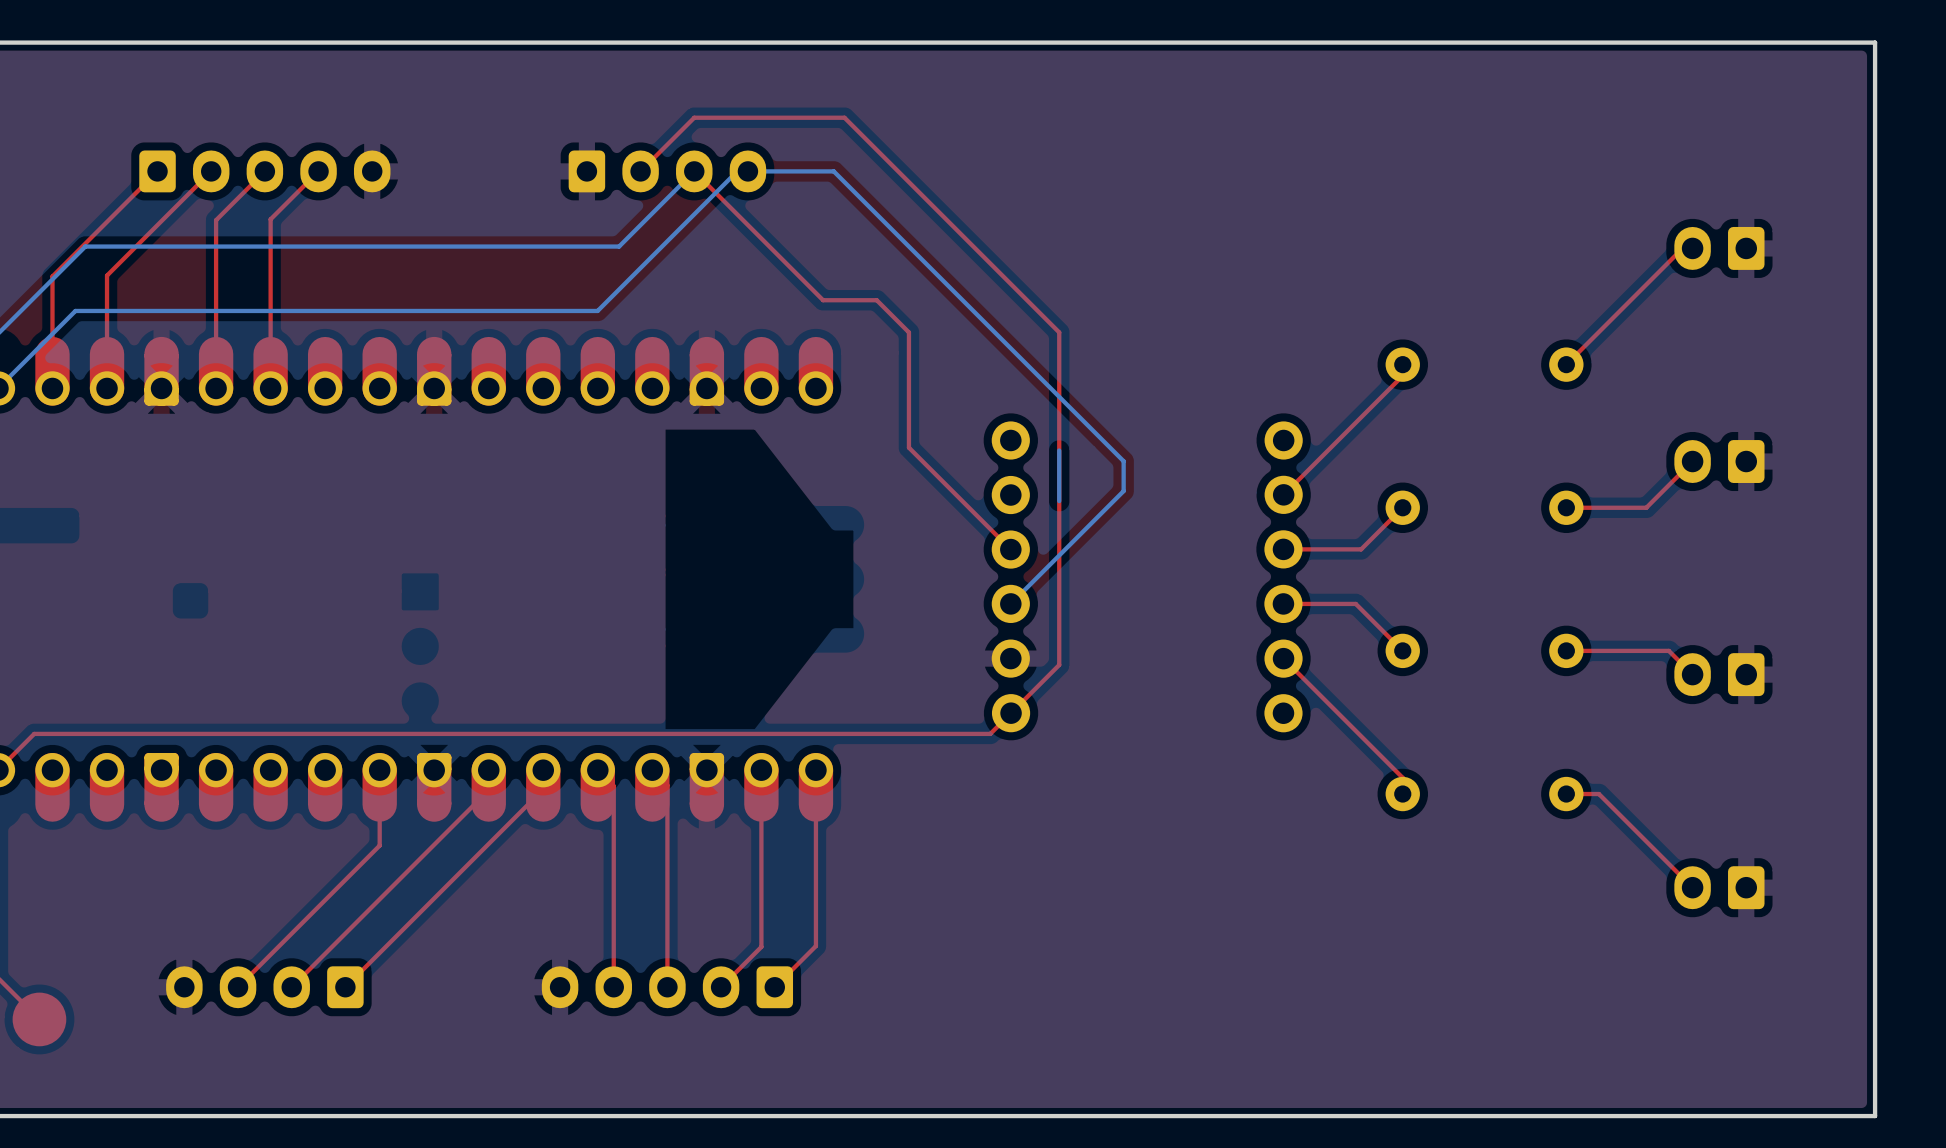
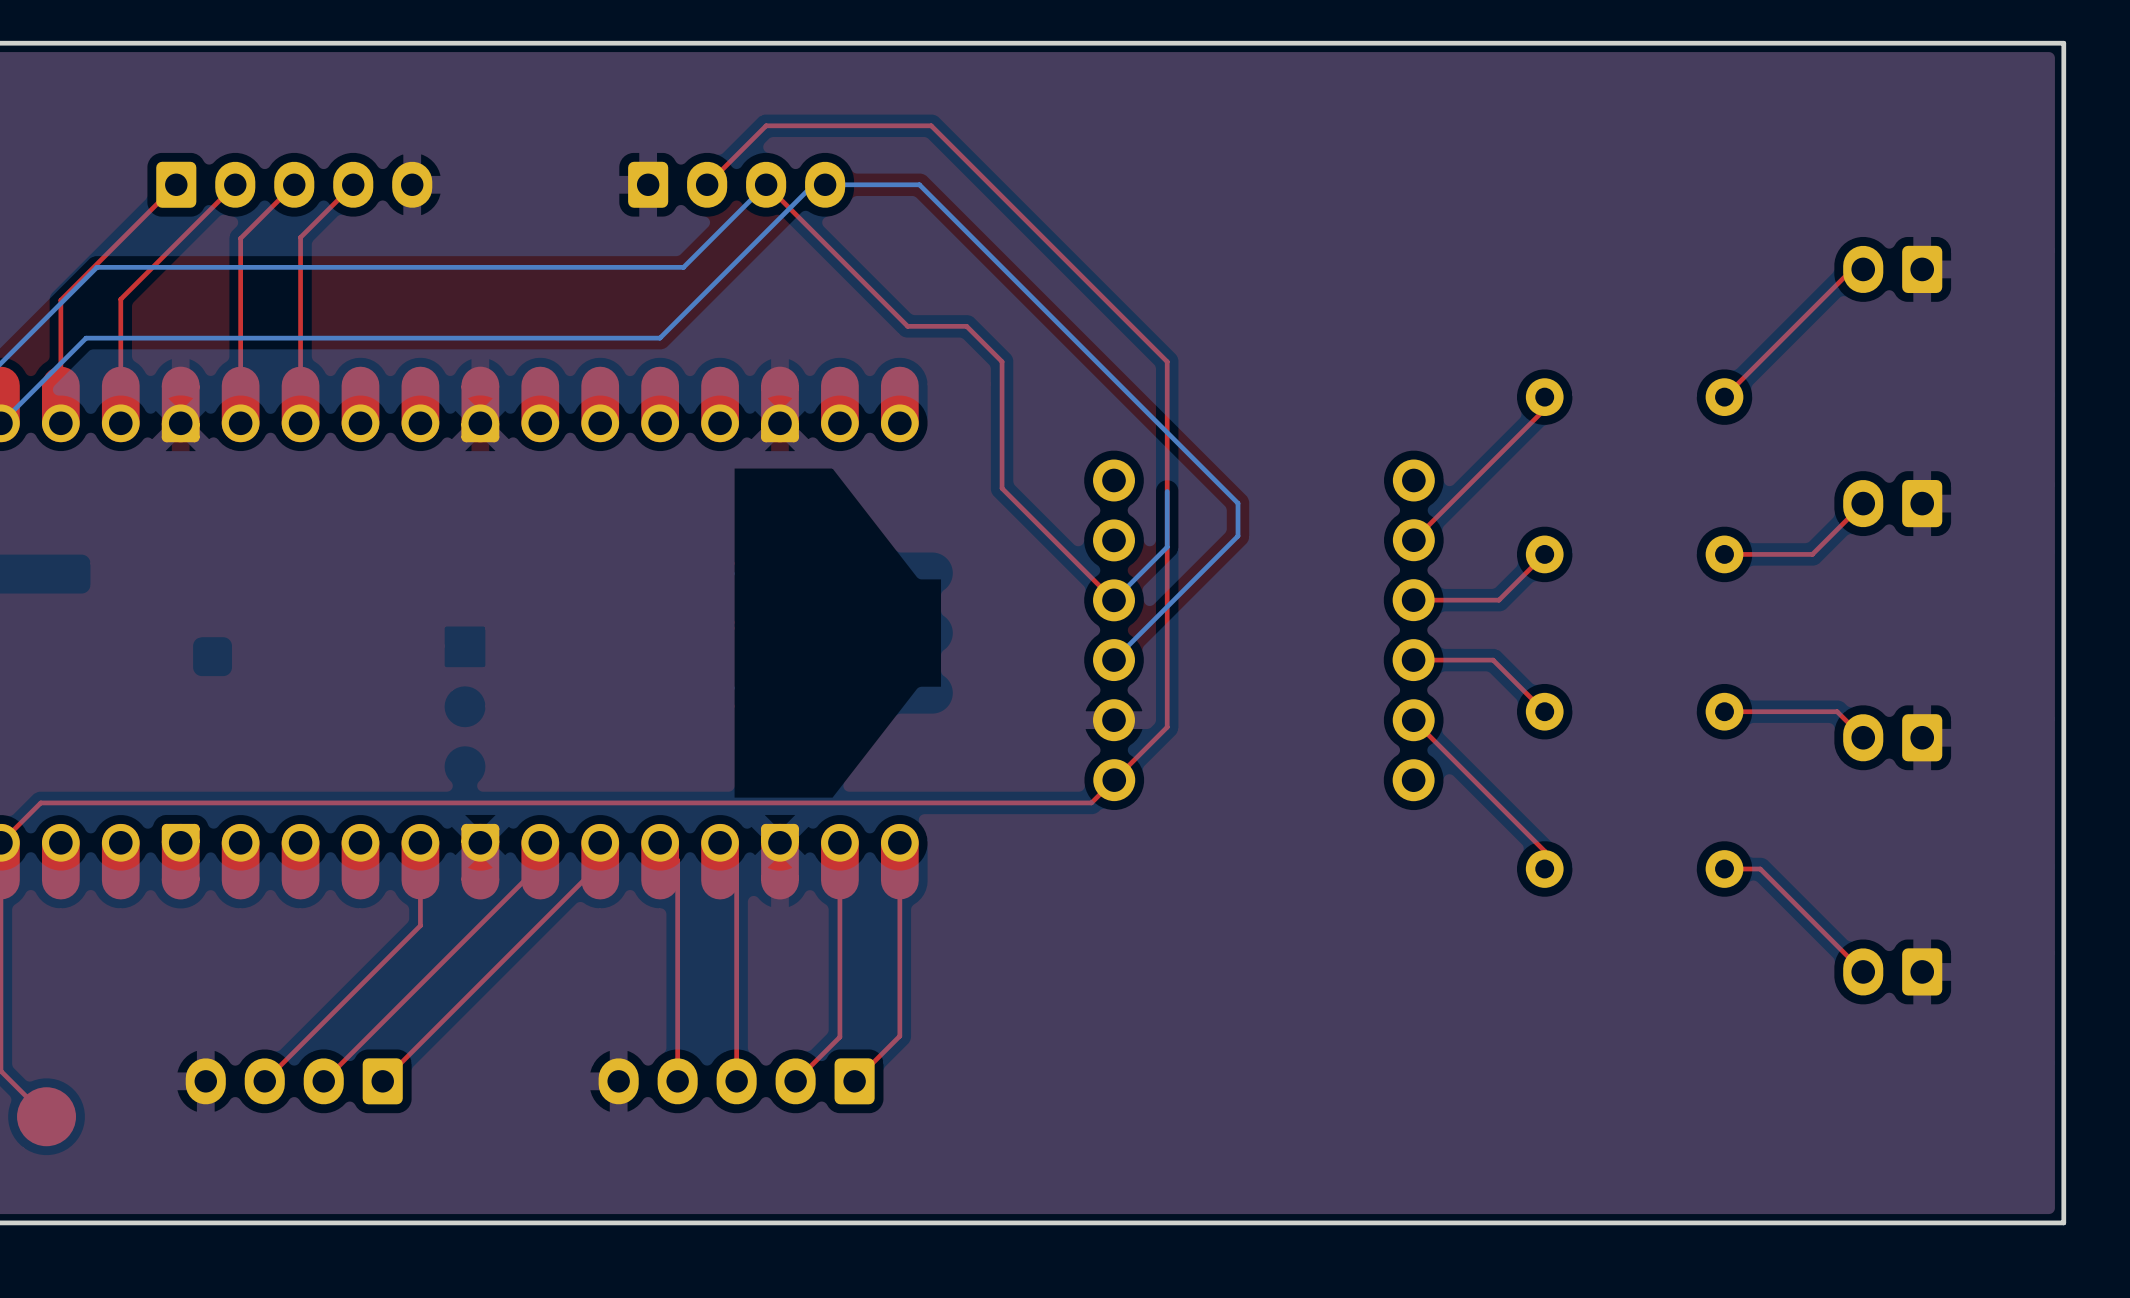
bottom track: none -> (1167, 547) (1114, 600)

